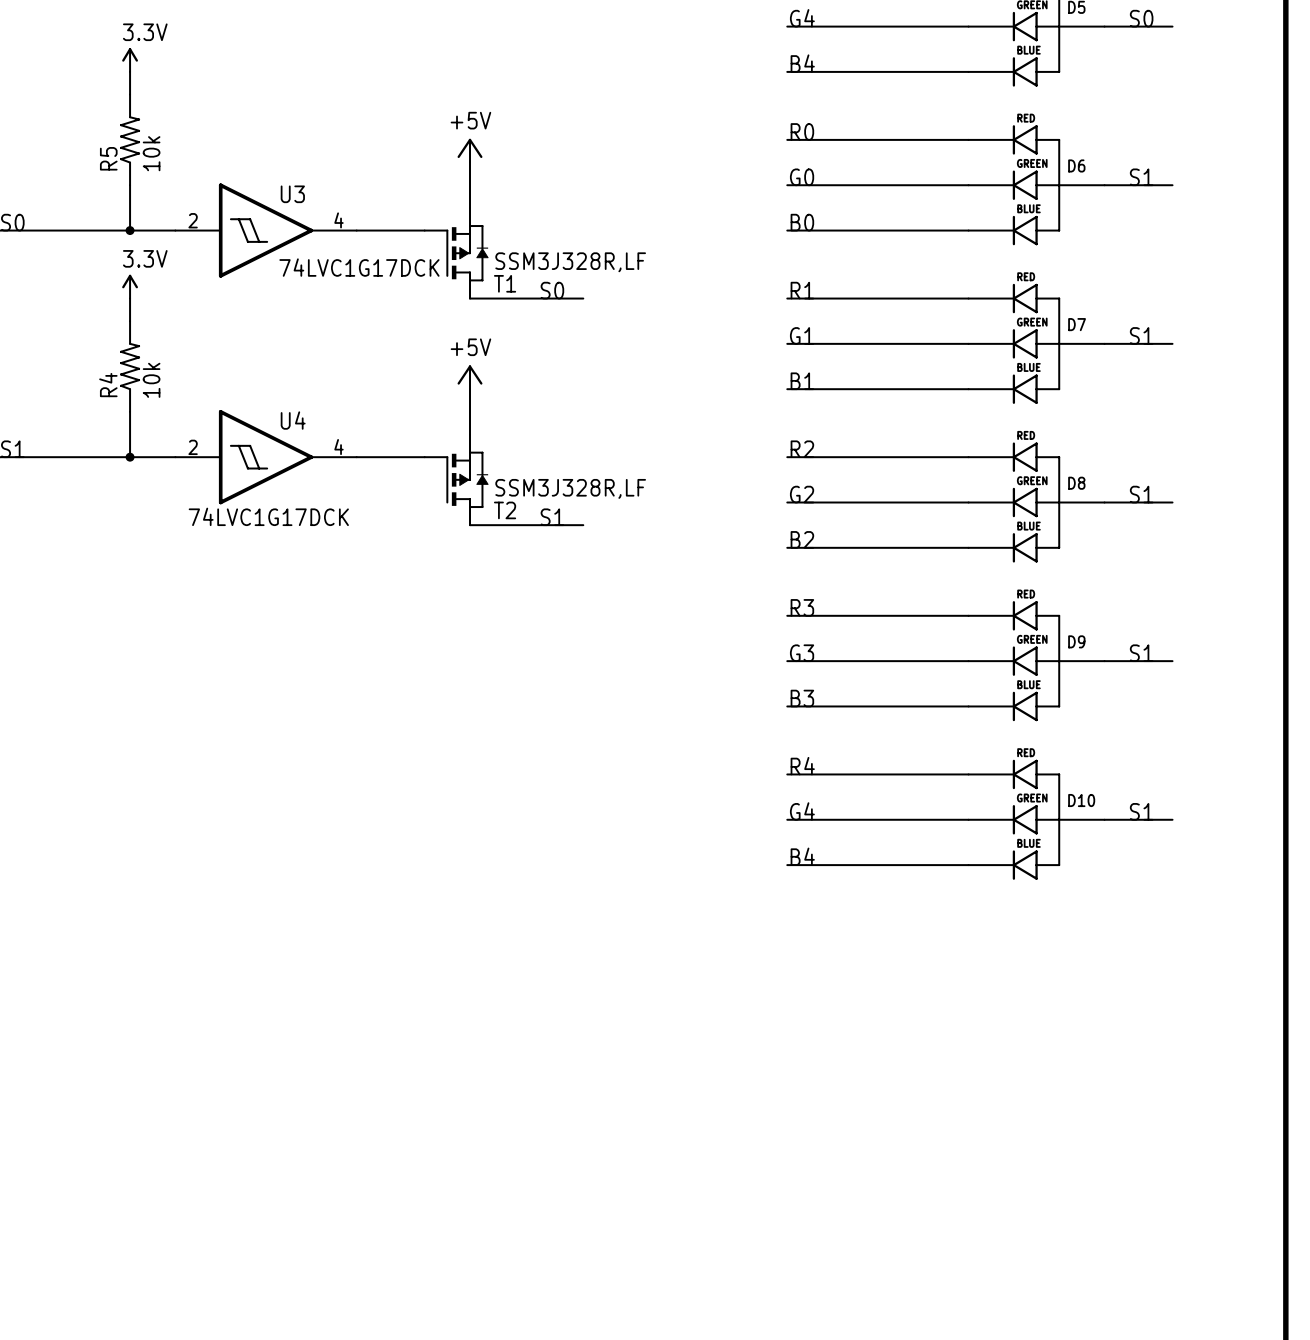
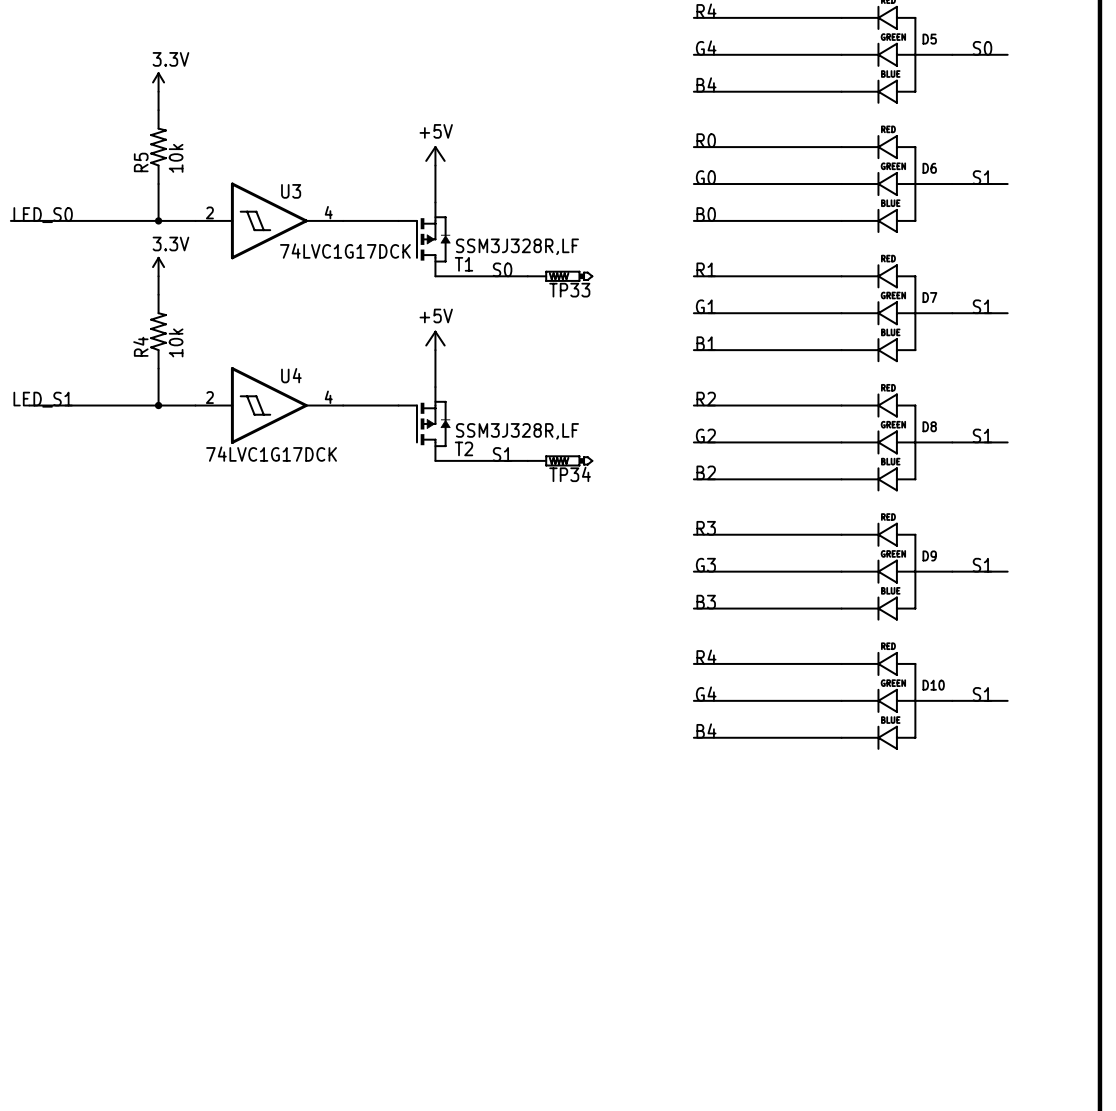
TP33: none -> (560, 276)
TP34: none -> (560, 460)

